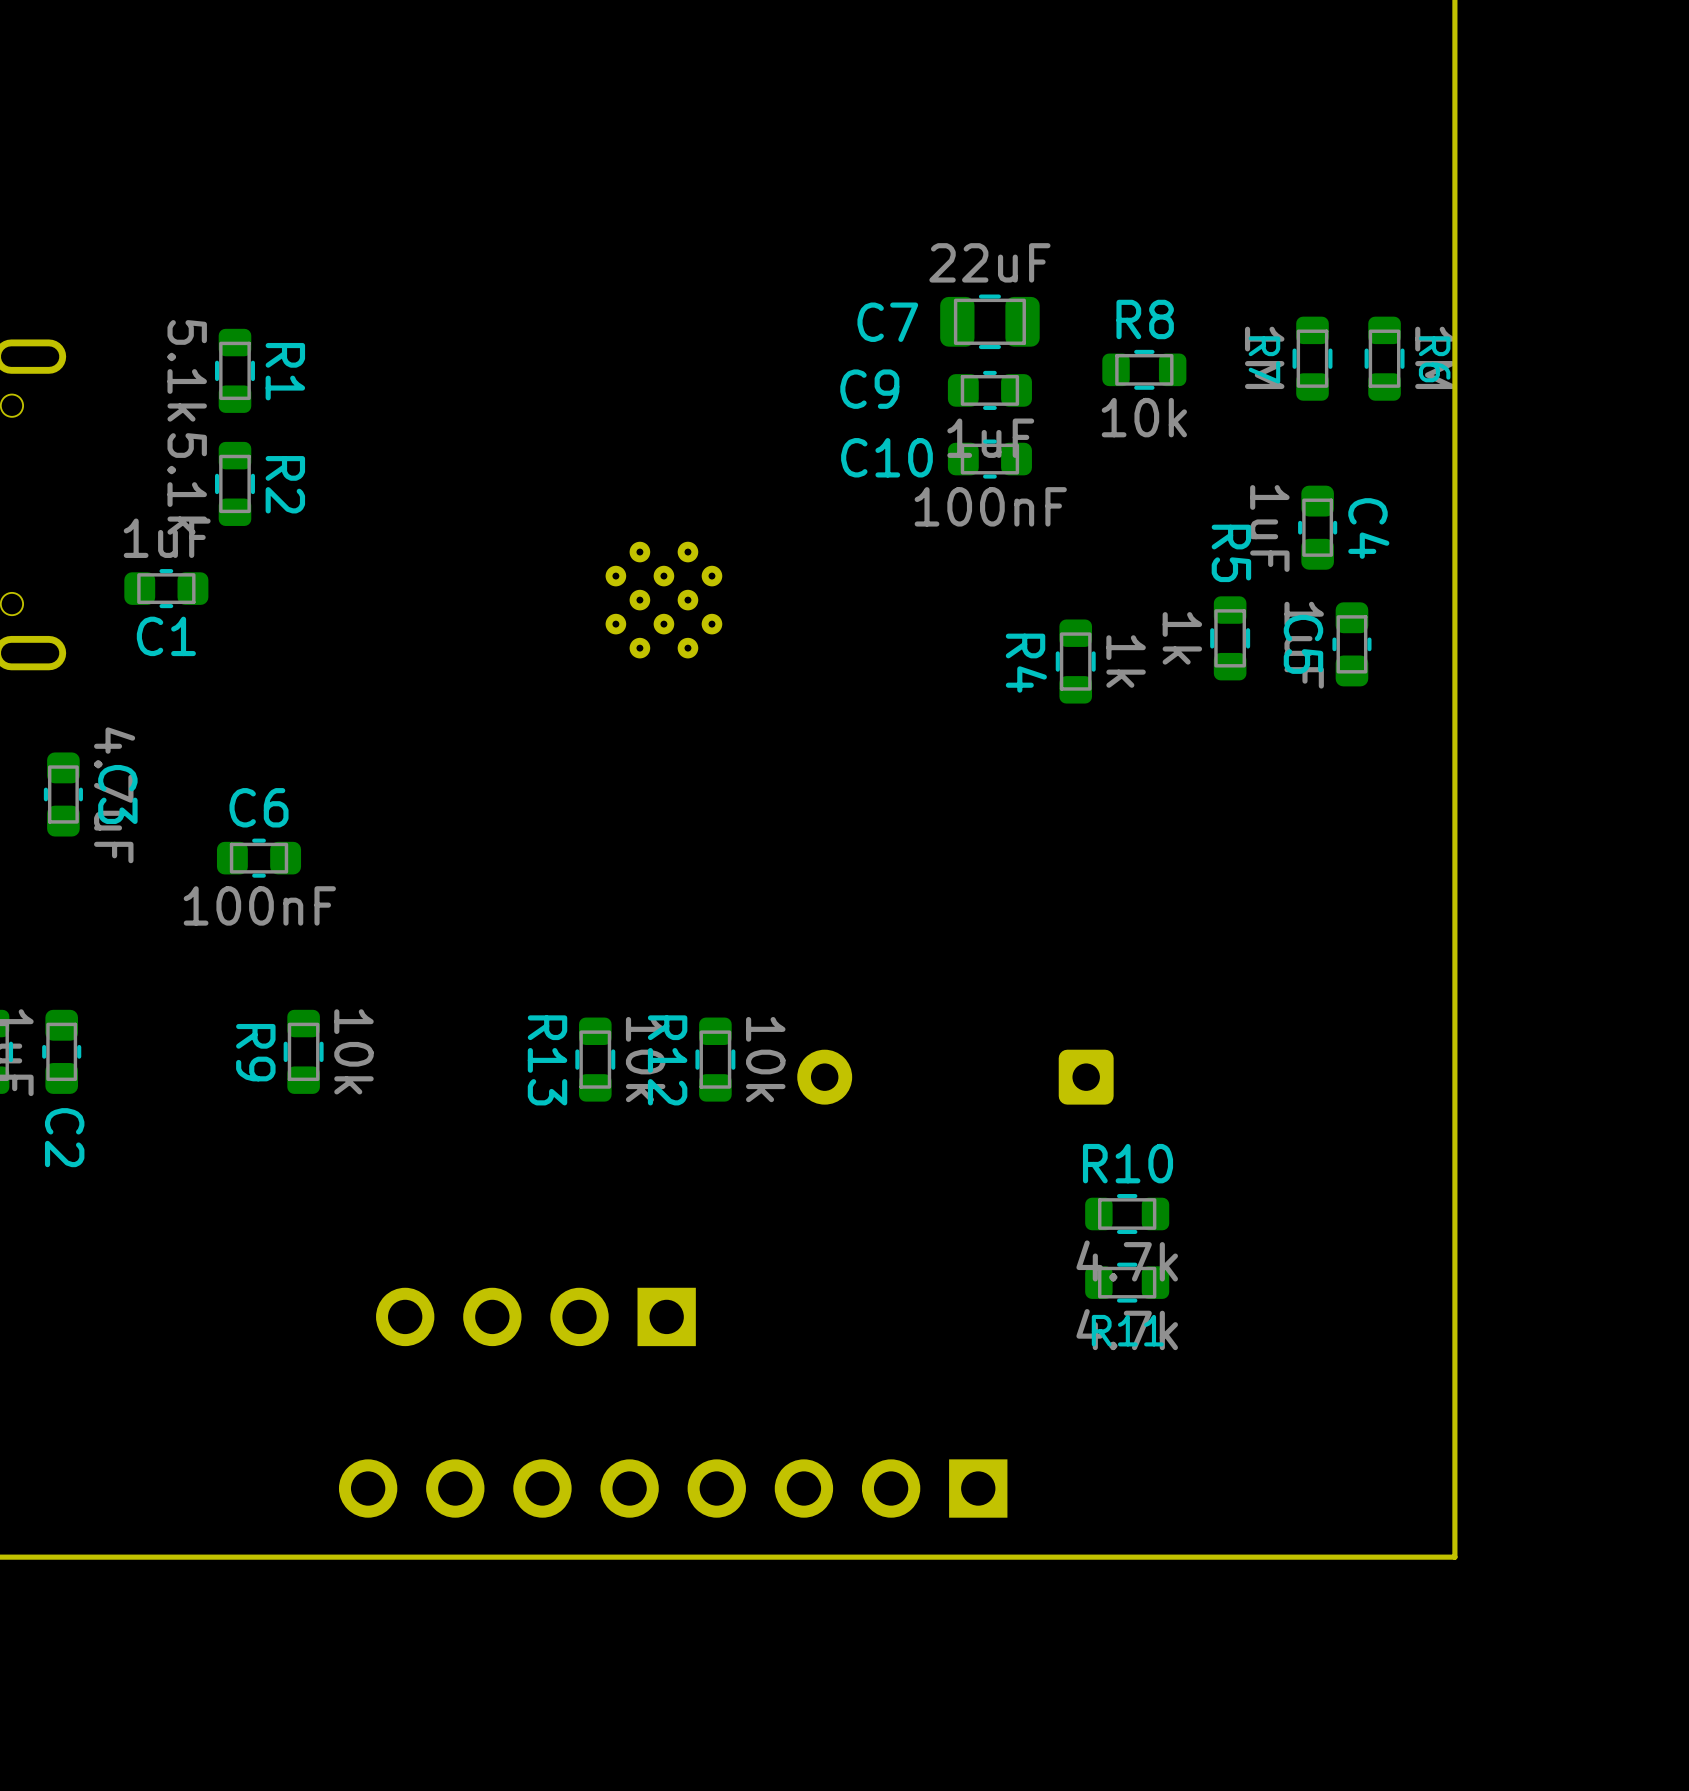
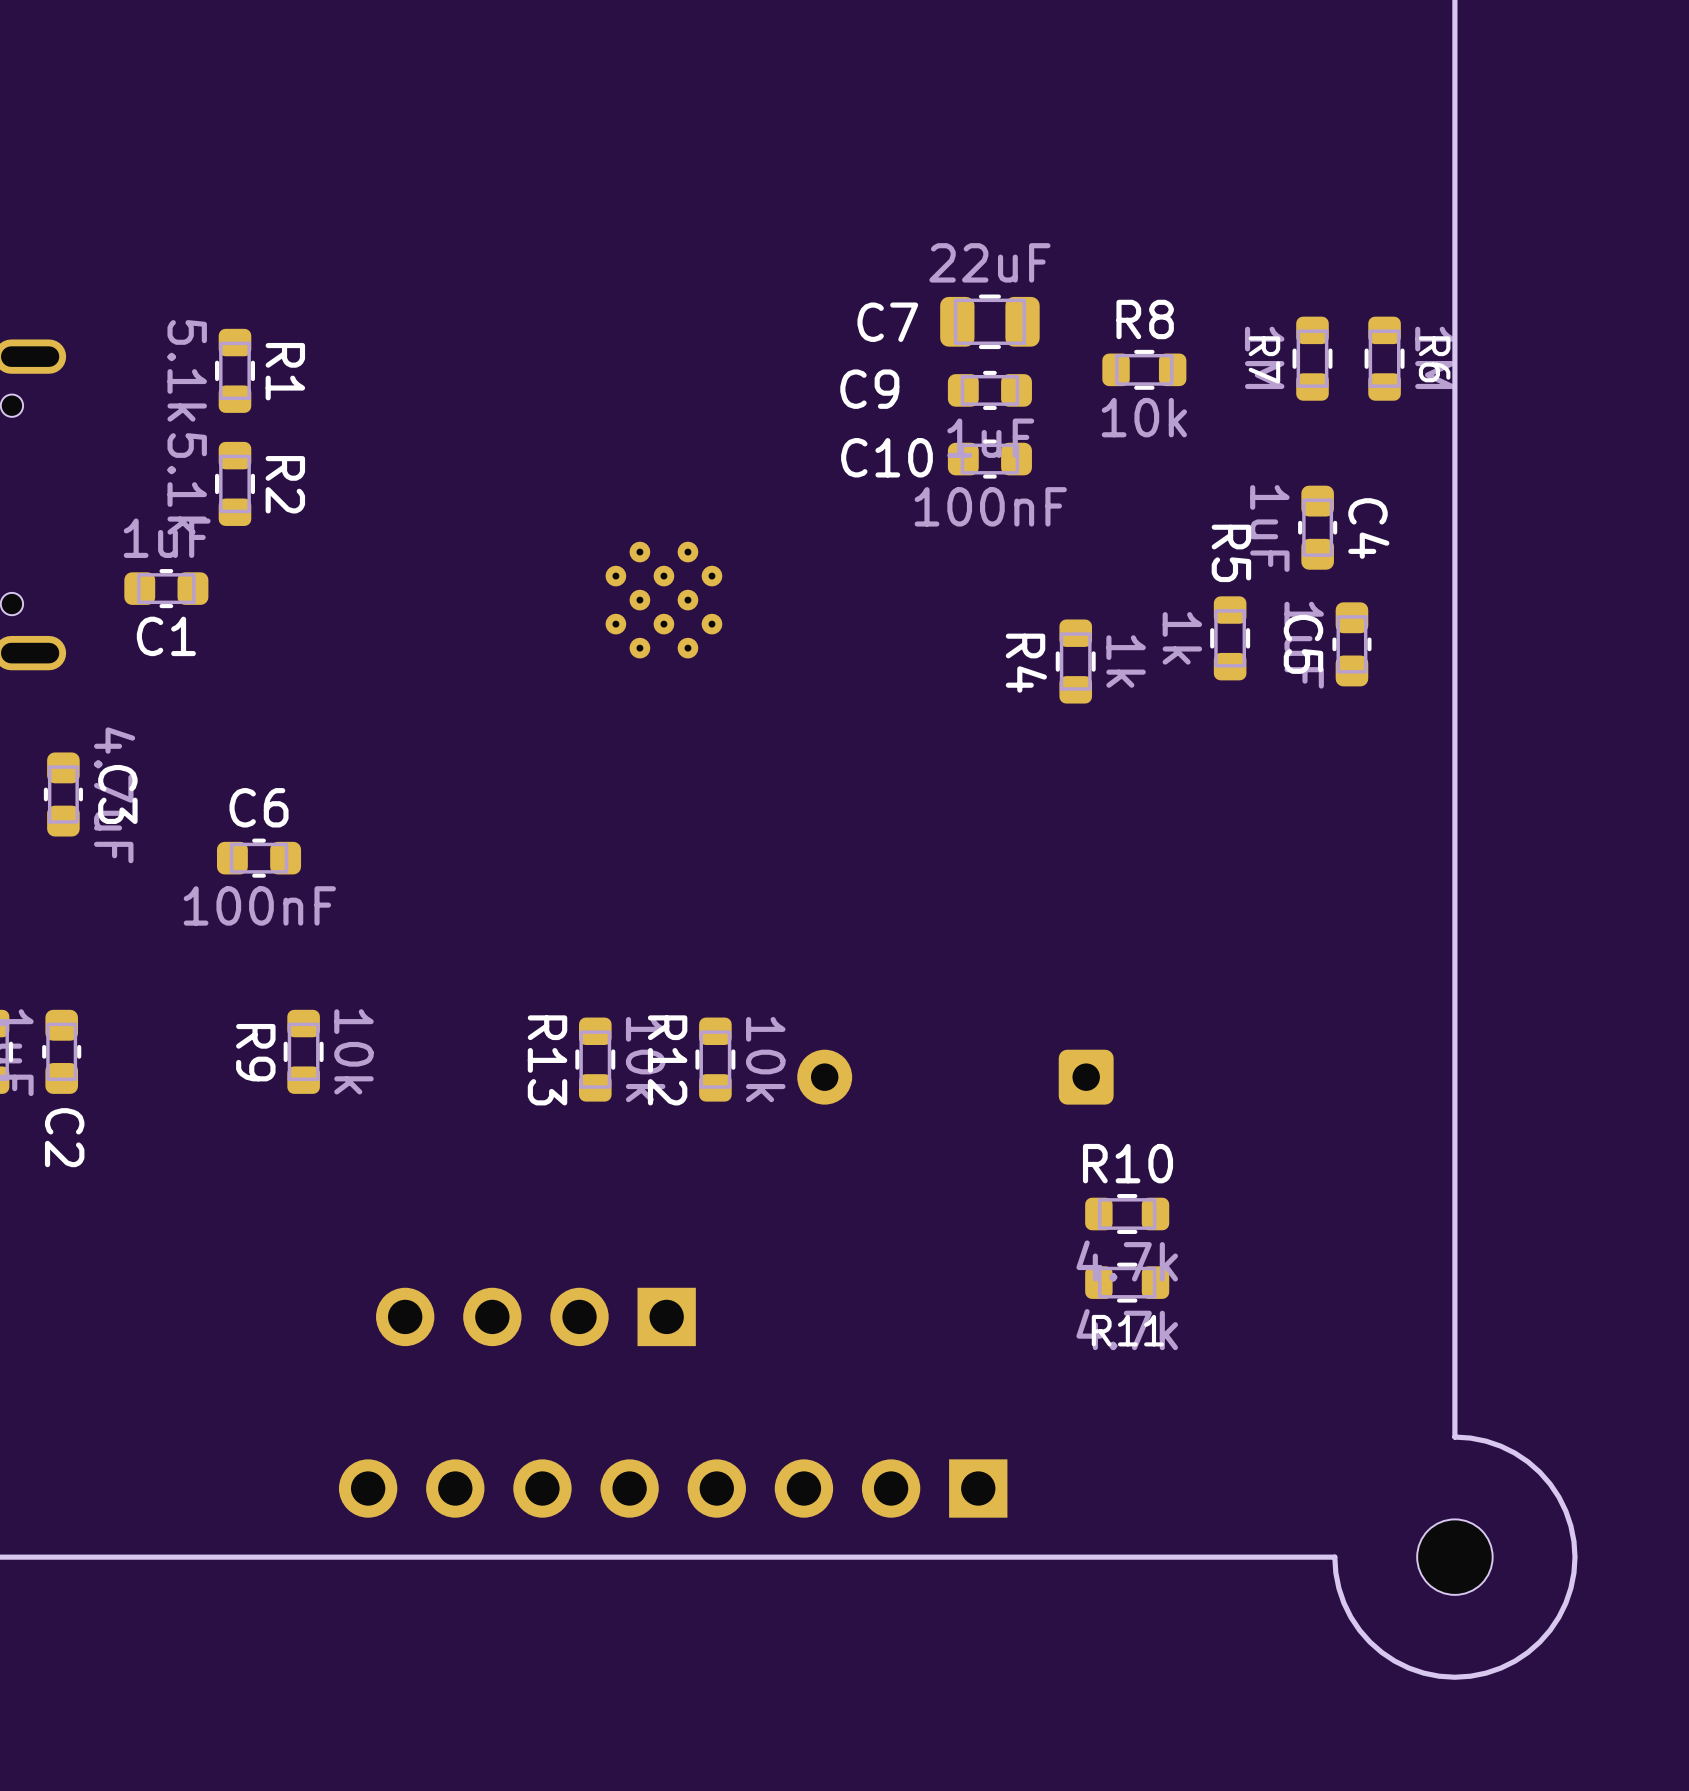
board edge: (1454, 1437) (1454, 1557) (1334, 1557) -> (1454, 1437) (1485, 1441) (1500, 1446) (1528, 1461) (1550, 1484) (1565, 1511) (1573, 1541) (1573, 1572) (1570, 1588) (1558, 1617) (1539, 1642) (1514, 1661) (1485, 1673) (1454, 1677) (1439, 1676) (1408, 1668) (1381, 1652) (1359, 1630) (1350, 1617) (1338, 1588) (1334, 1557)
part: none -> (1454, 1557)

